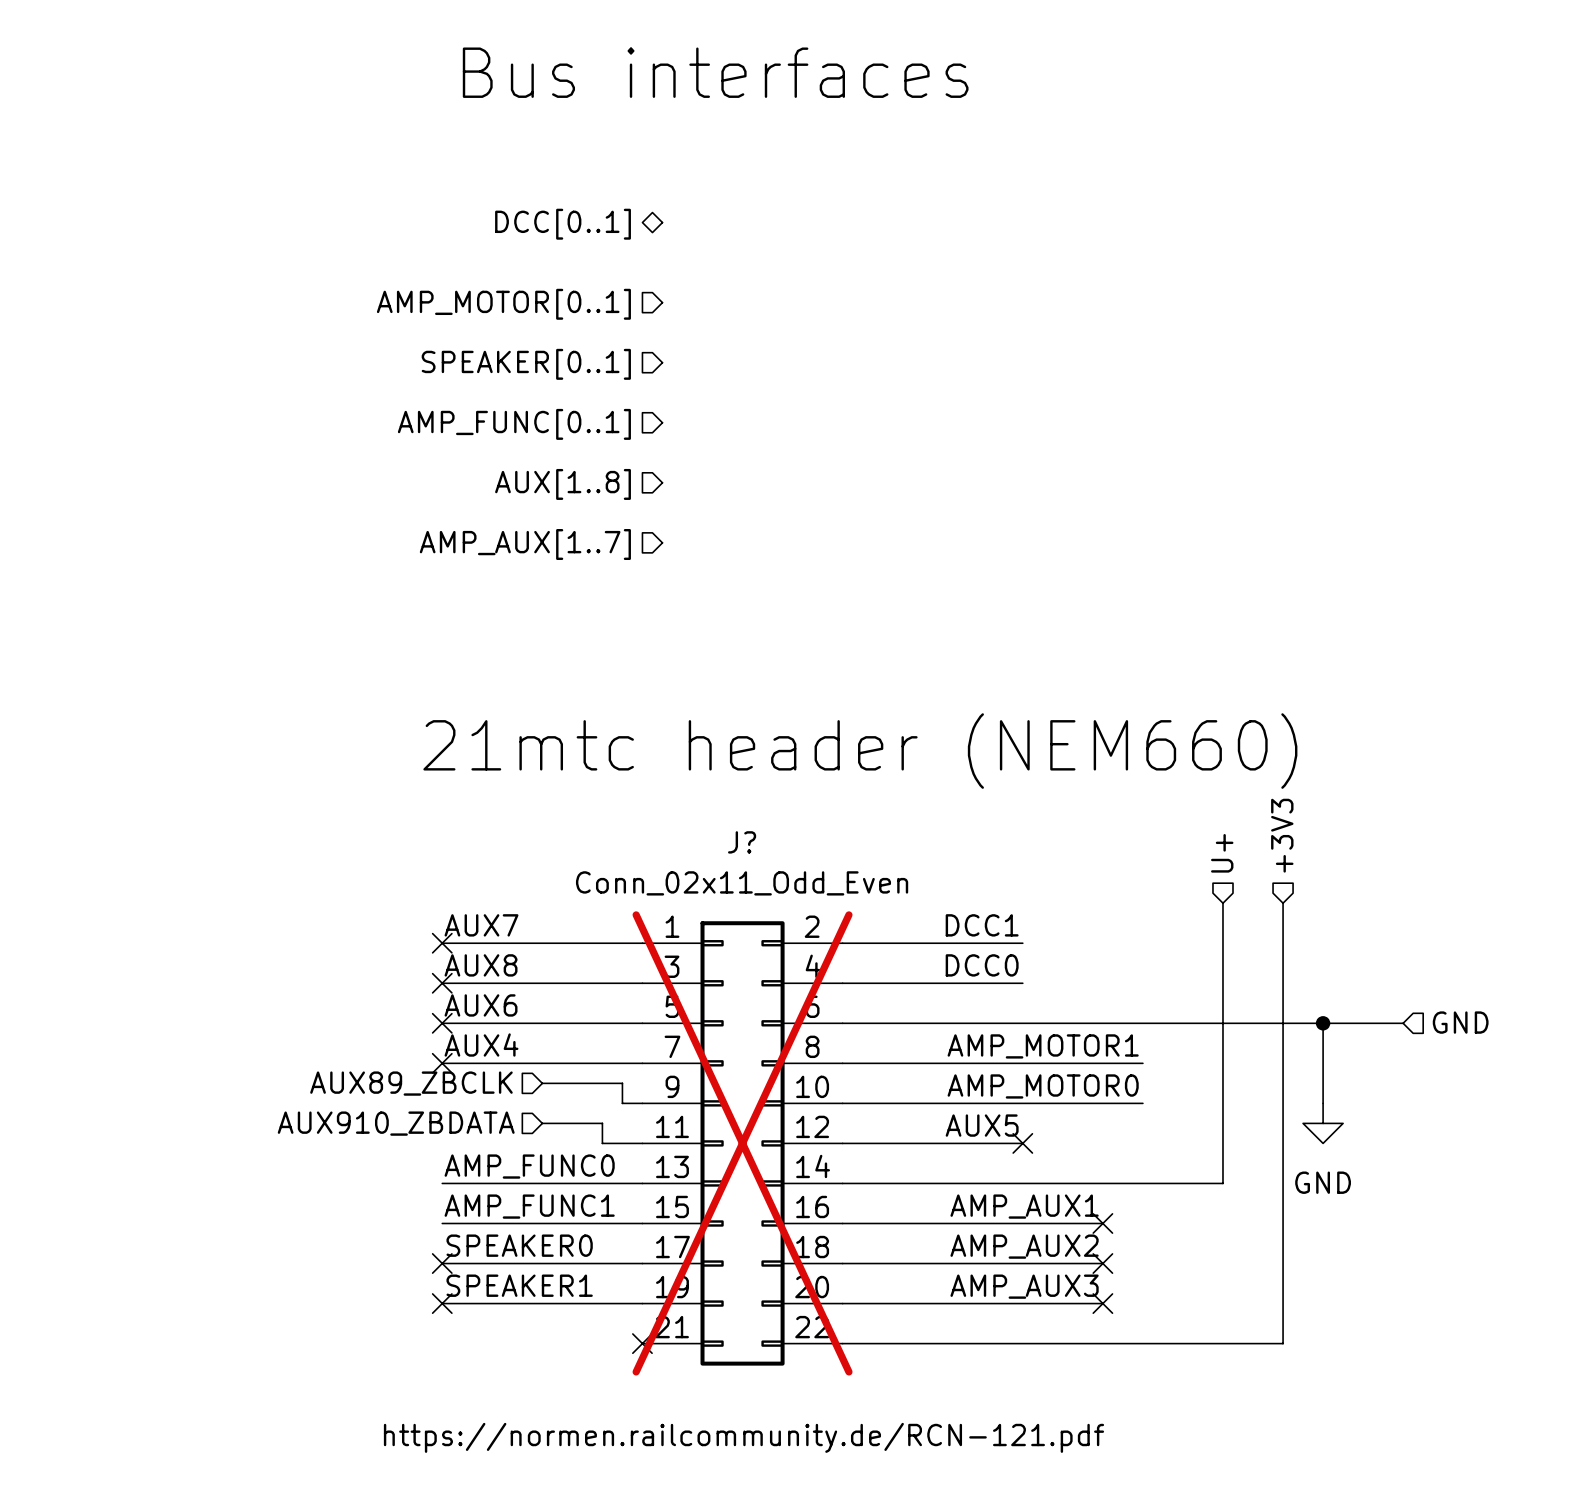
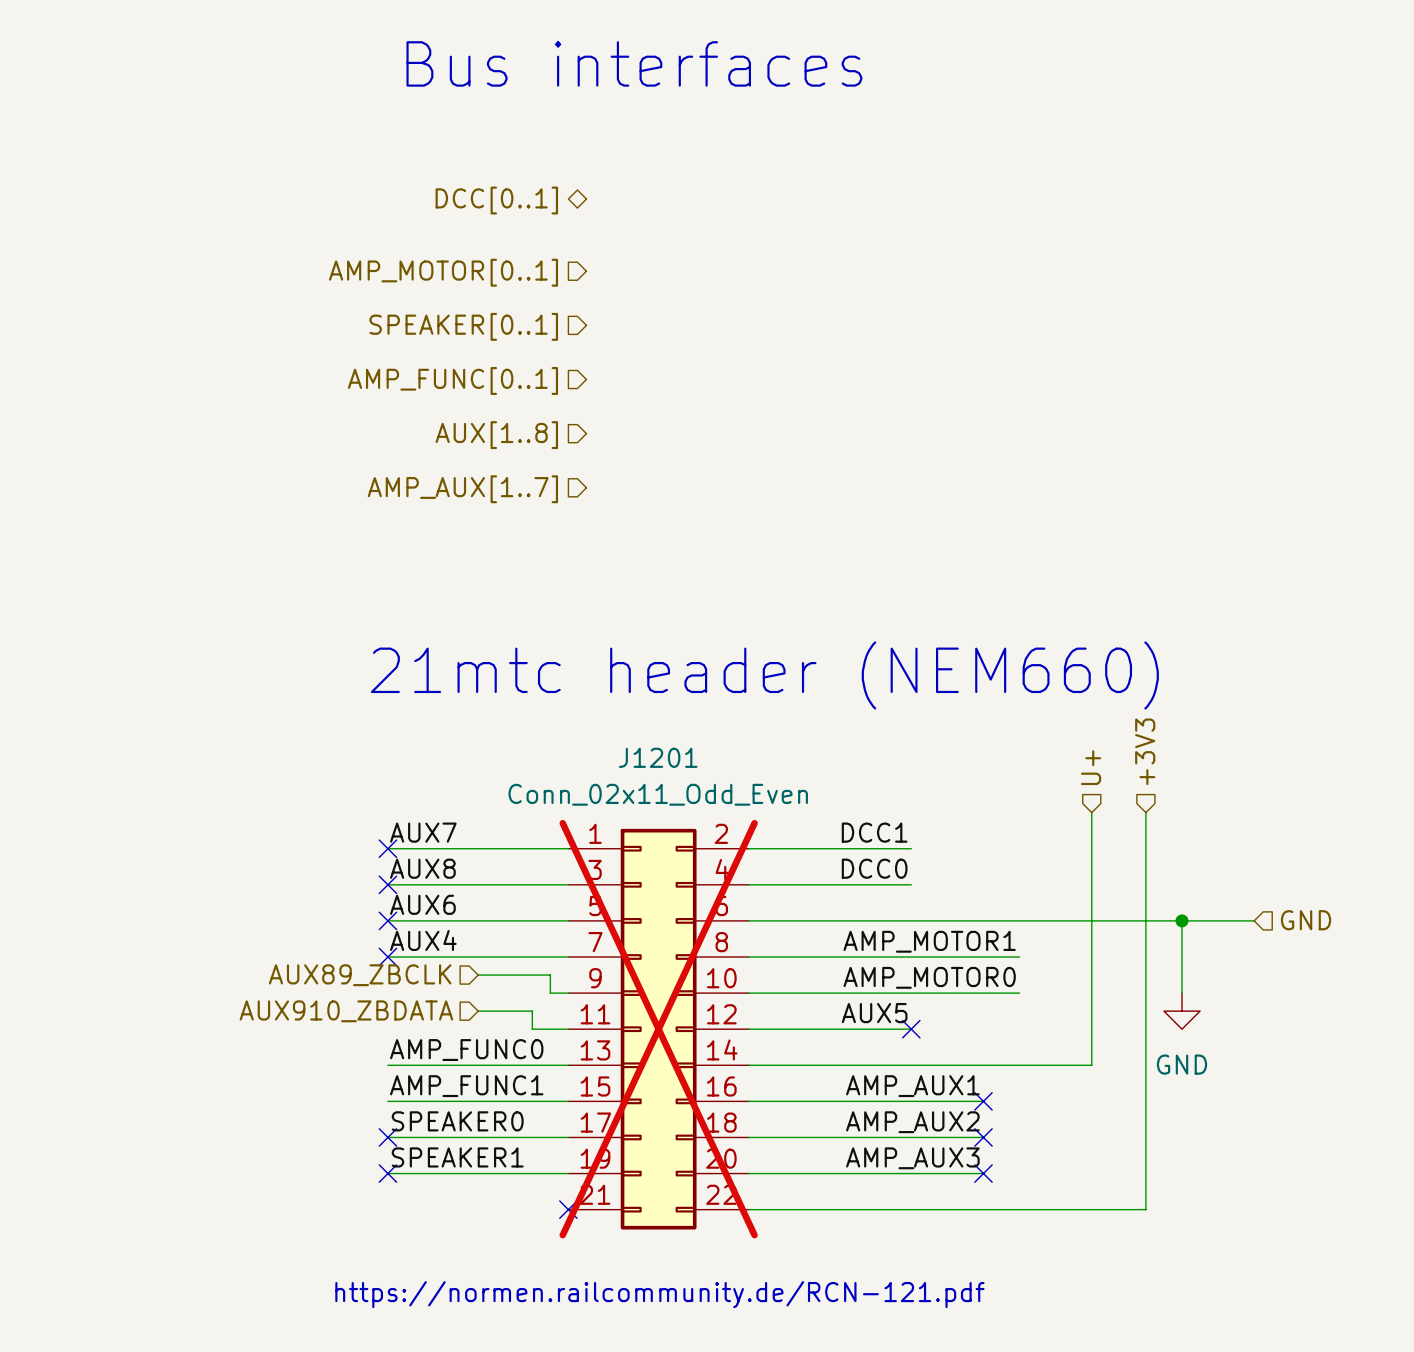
J? name: J? (742, 842) -> J1201 (658, 757)

